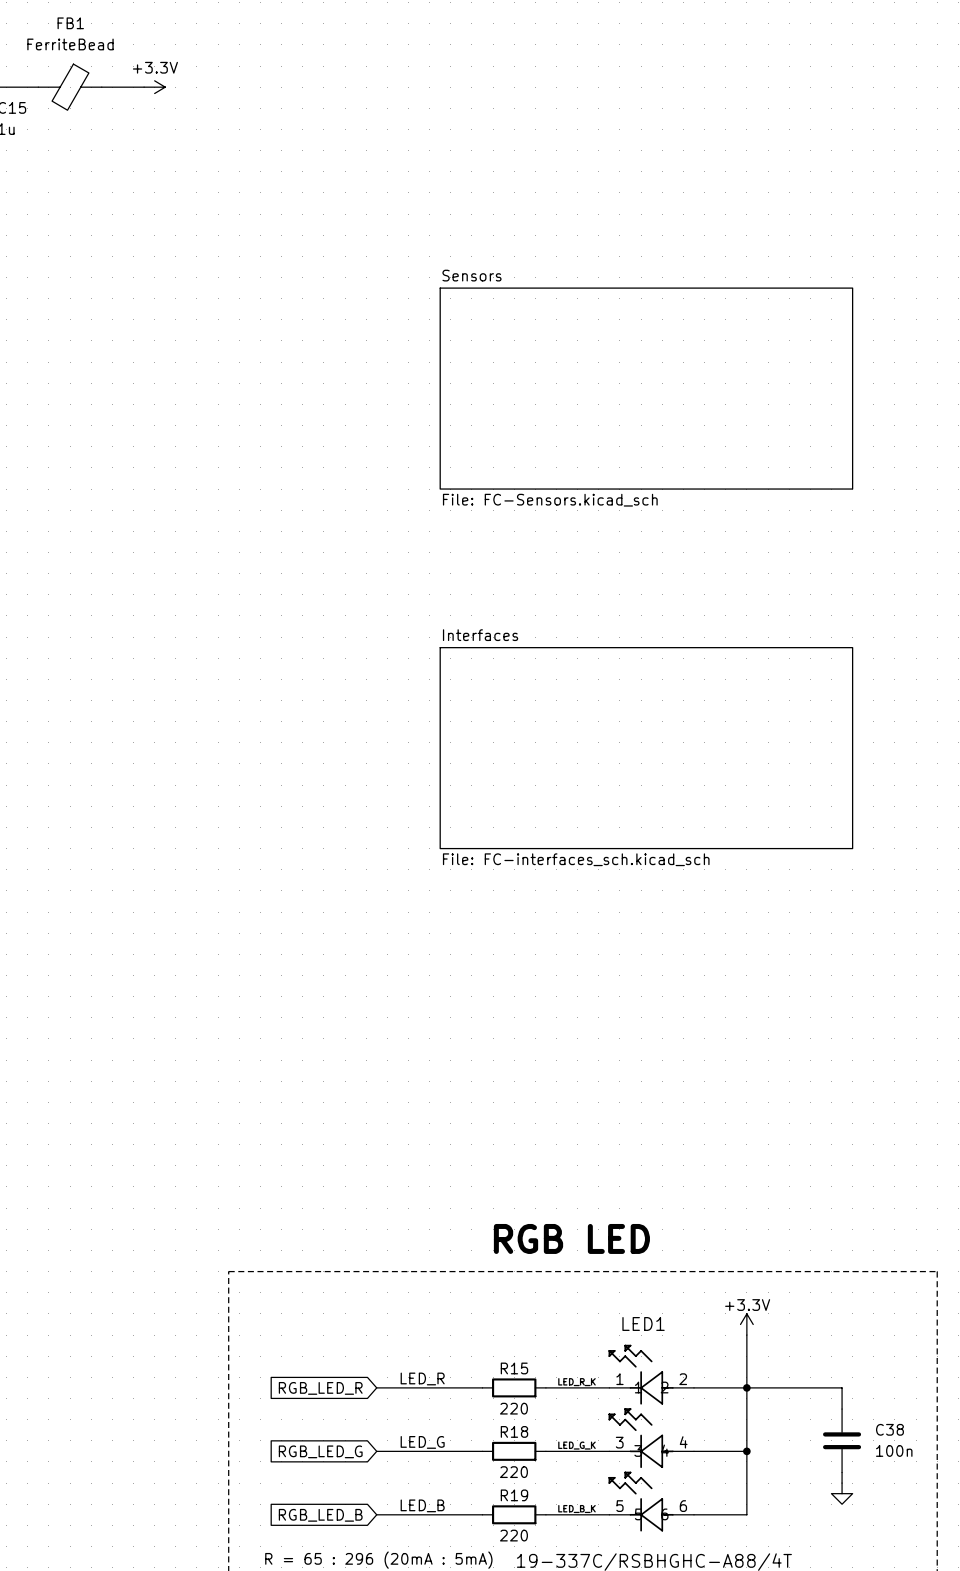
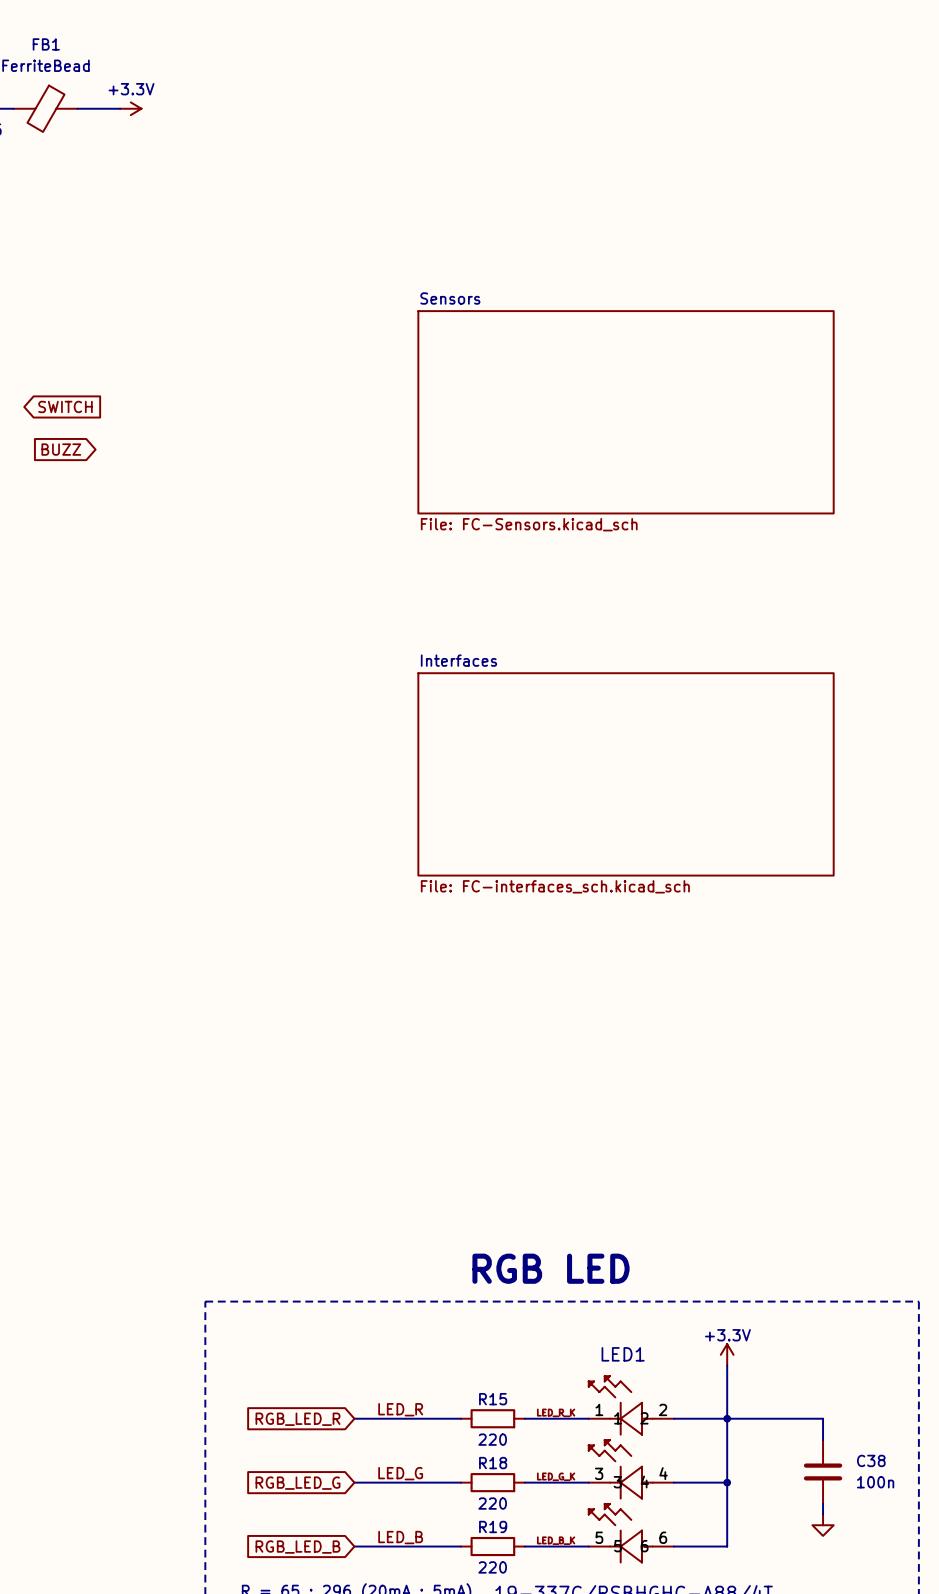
global label: none -> SWITCH (65, 406)
global label: none -> BUZZ (61, 449)

